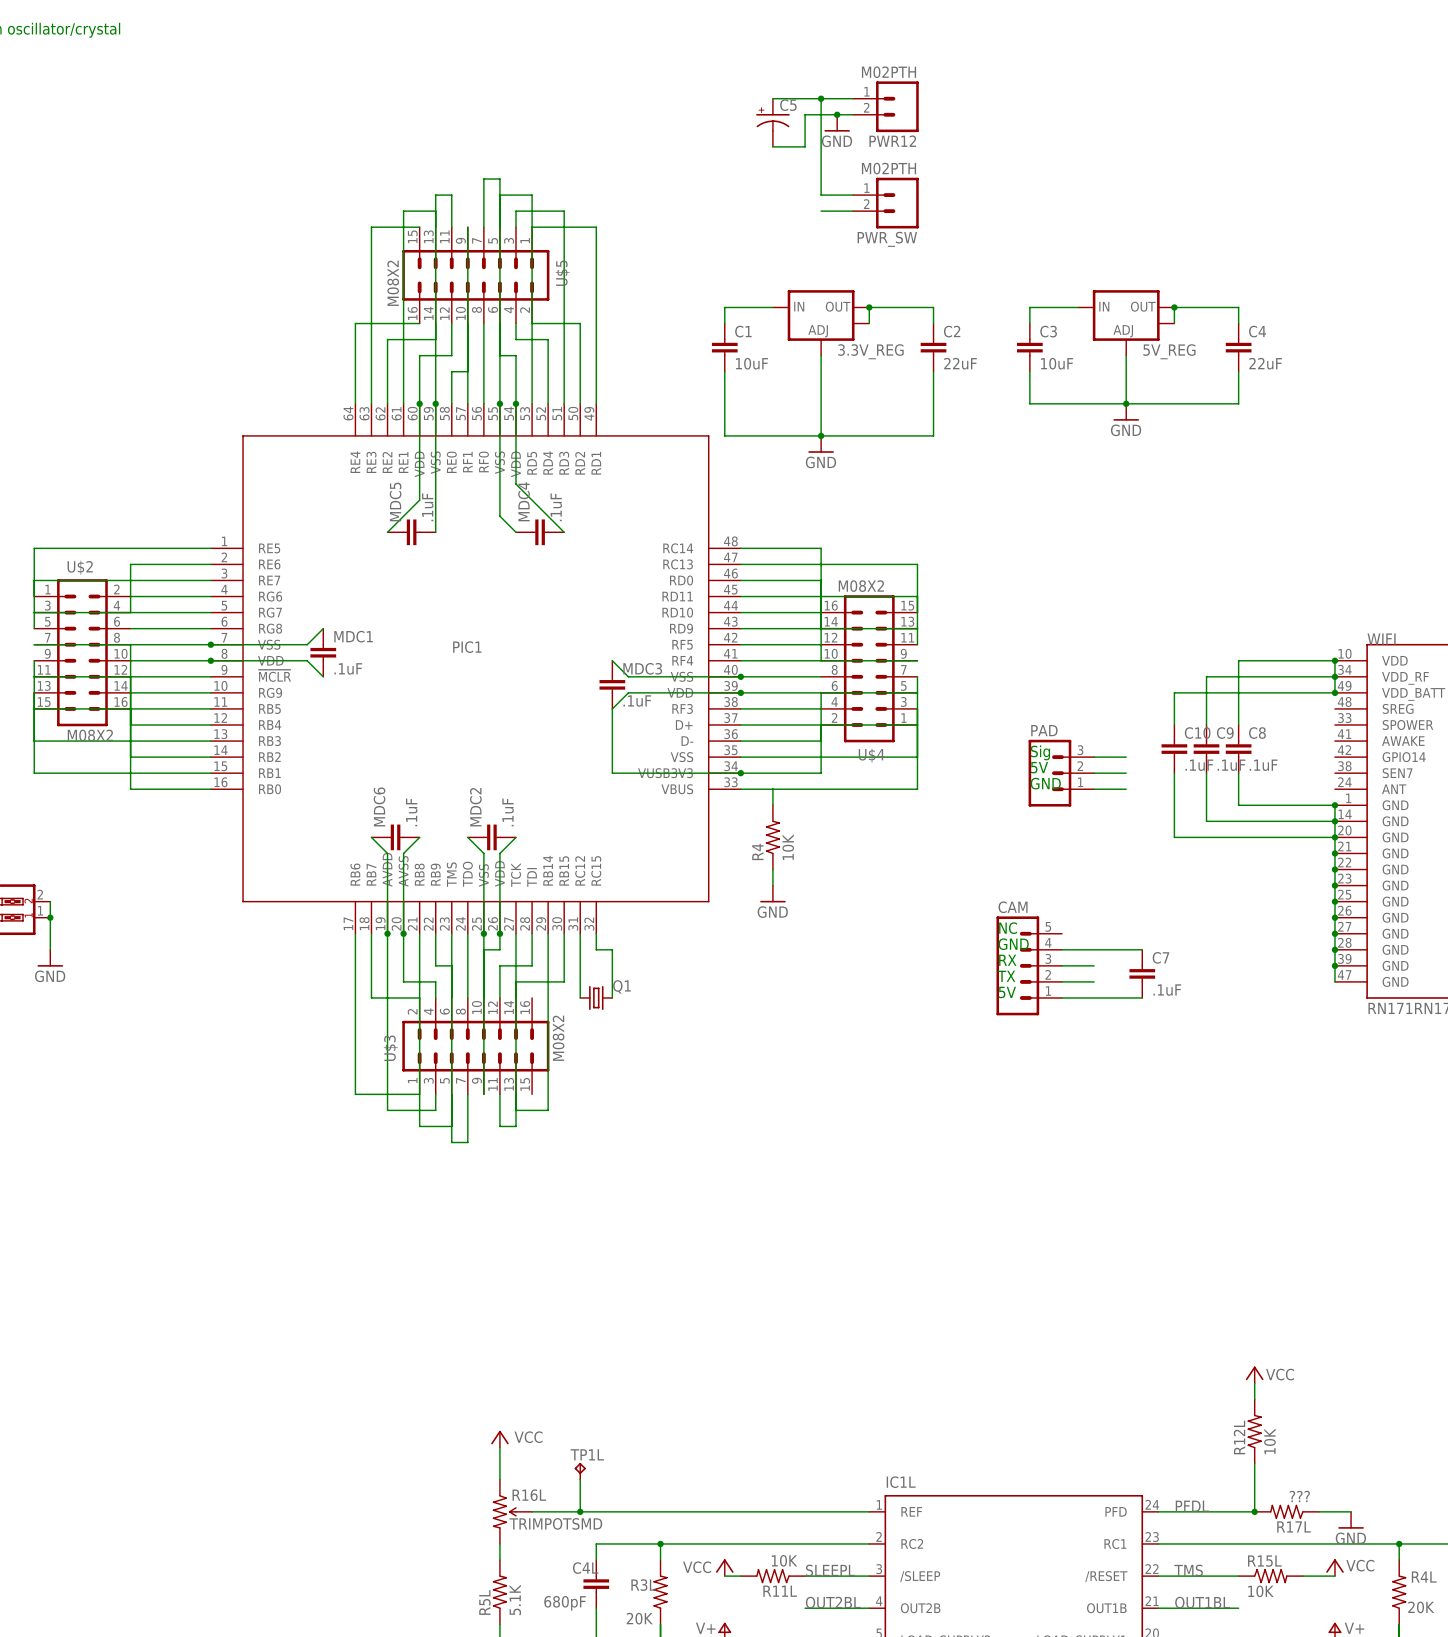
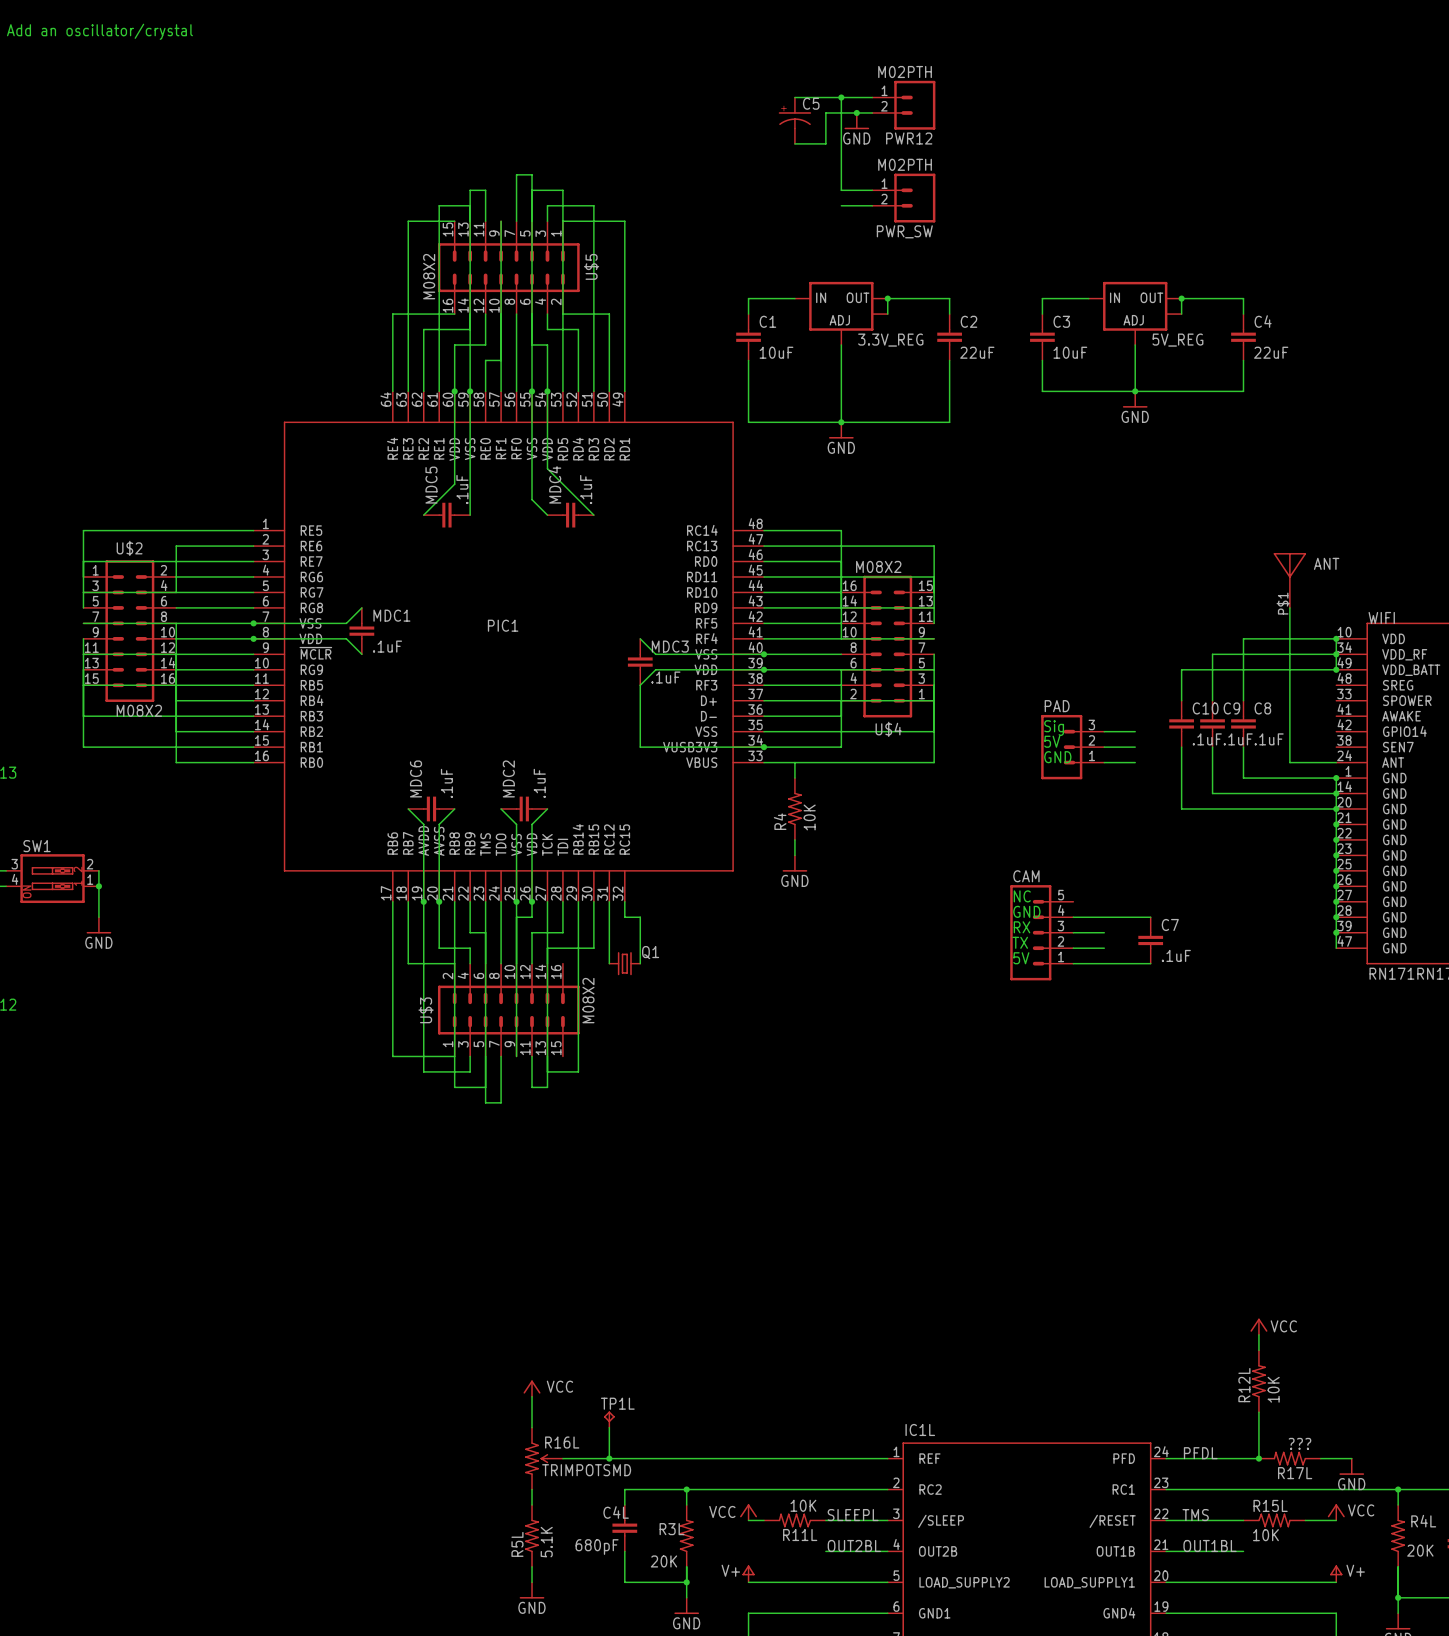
ANT: none -> (1289, 580)
wire: none -> (1289, 607) (1289, 762) (1336, 762)

